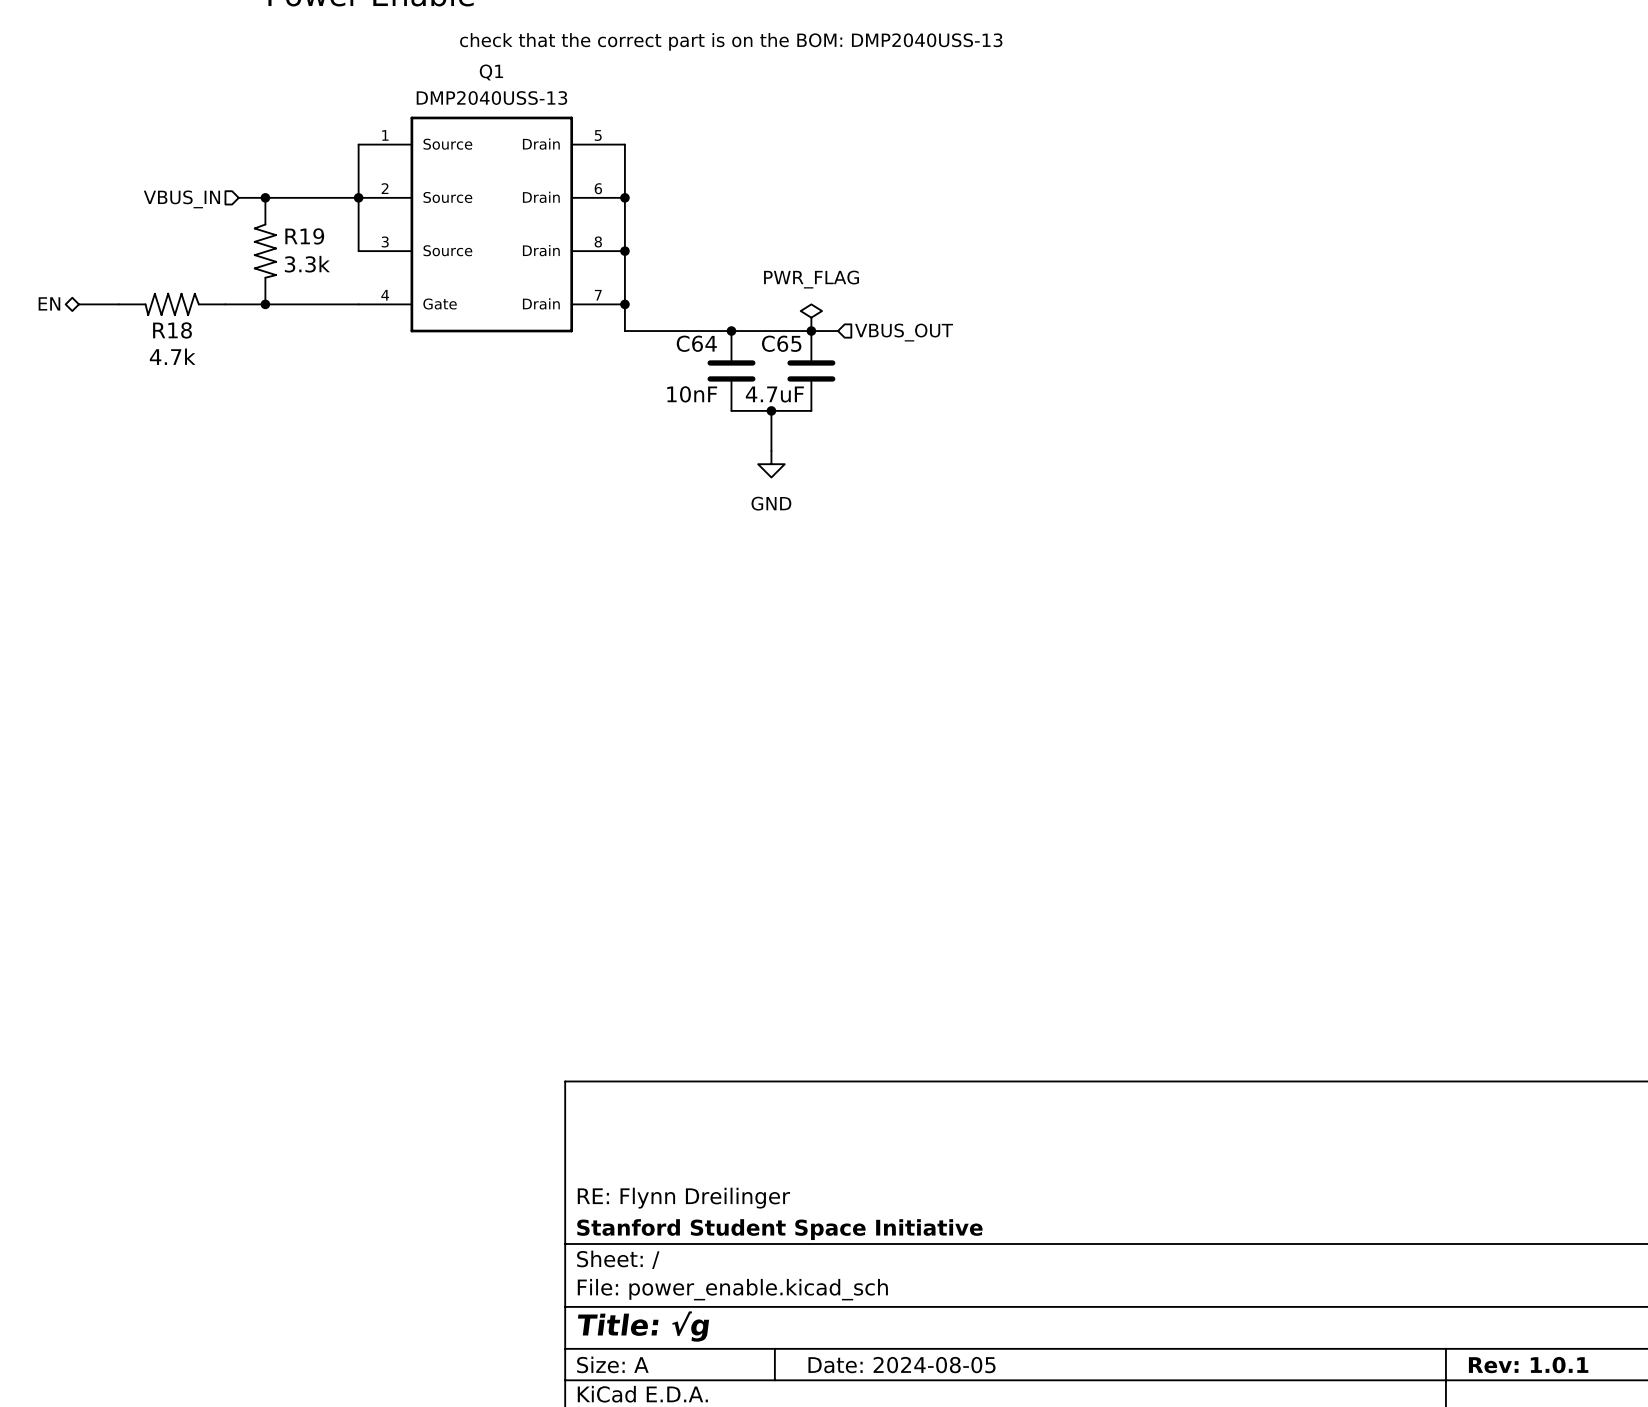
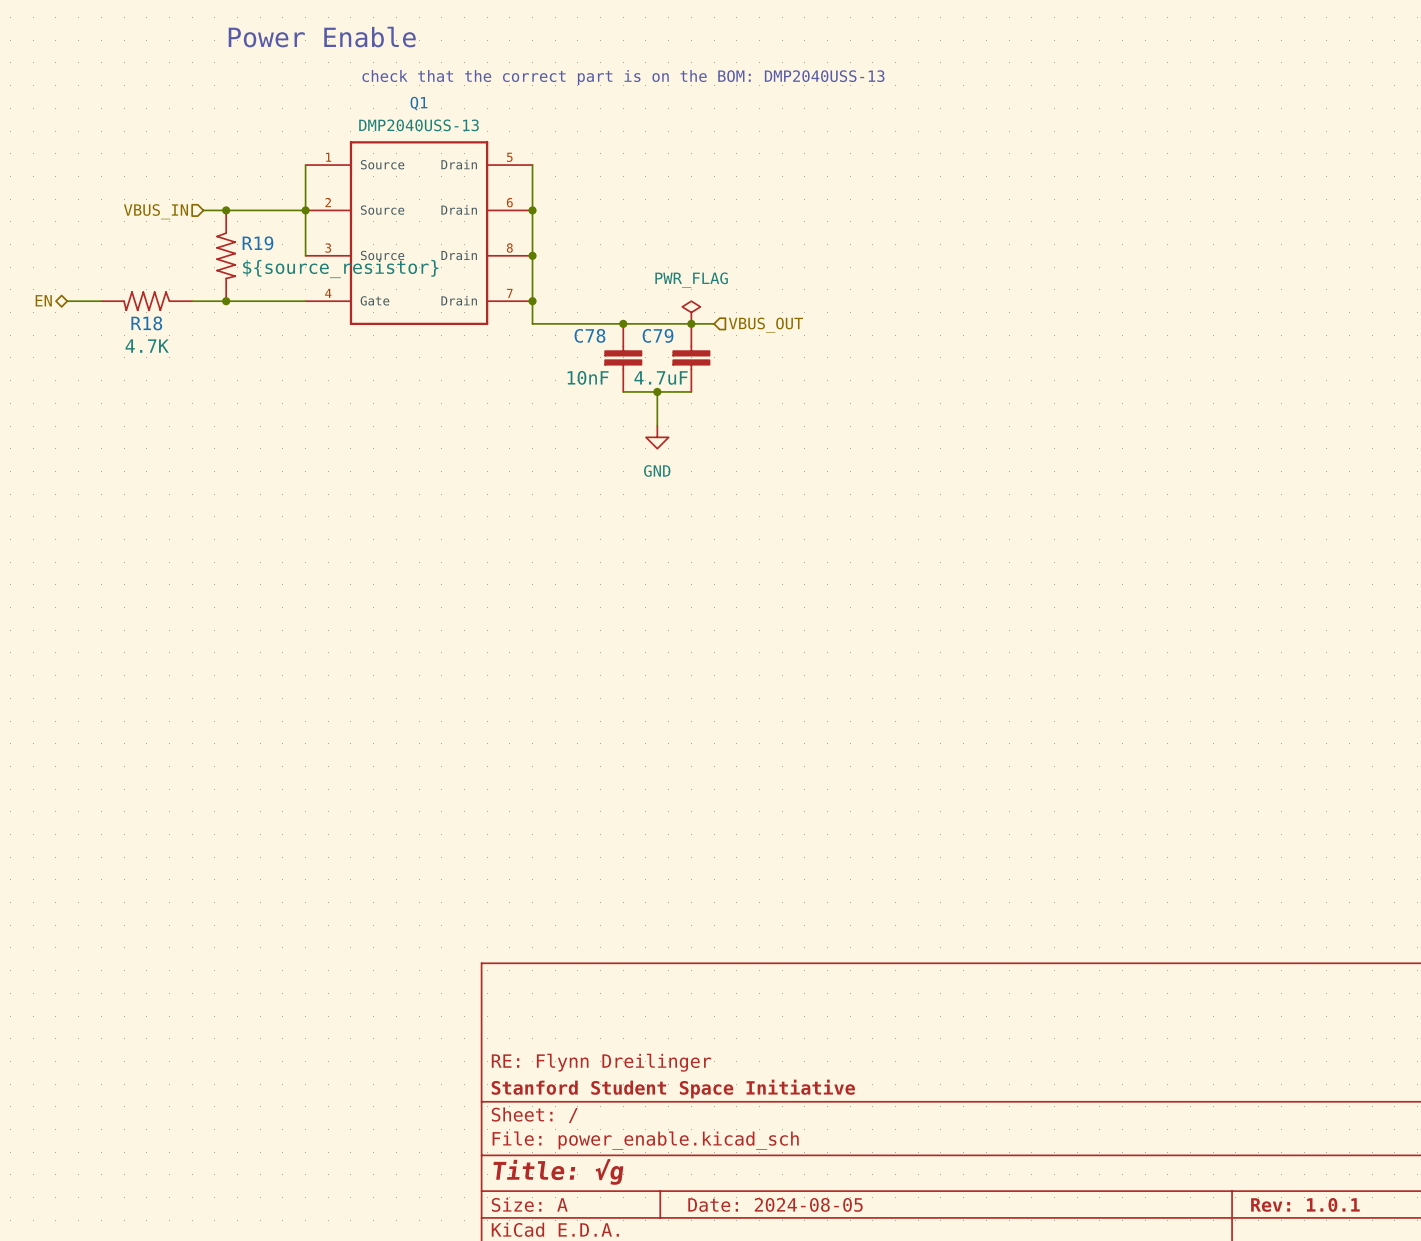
R19 value: 3.3k (307, 264) -> ${source_resistor} (340, 268)
R18 value: 4.7k (172, 356) -> 4.7K (147, 346)
C64: 10nF (731, 370) -> none
C78: none -> 10nF (623, 357)
C65: 4.7uF (811, 370) -> none
C79: none -> 4.7uF (691, 357)

